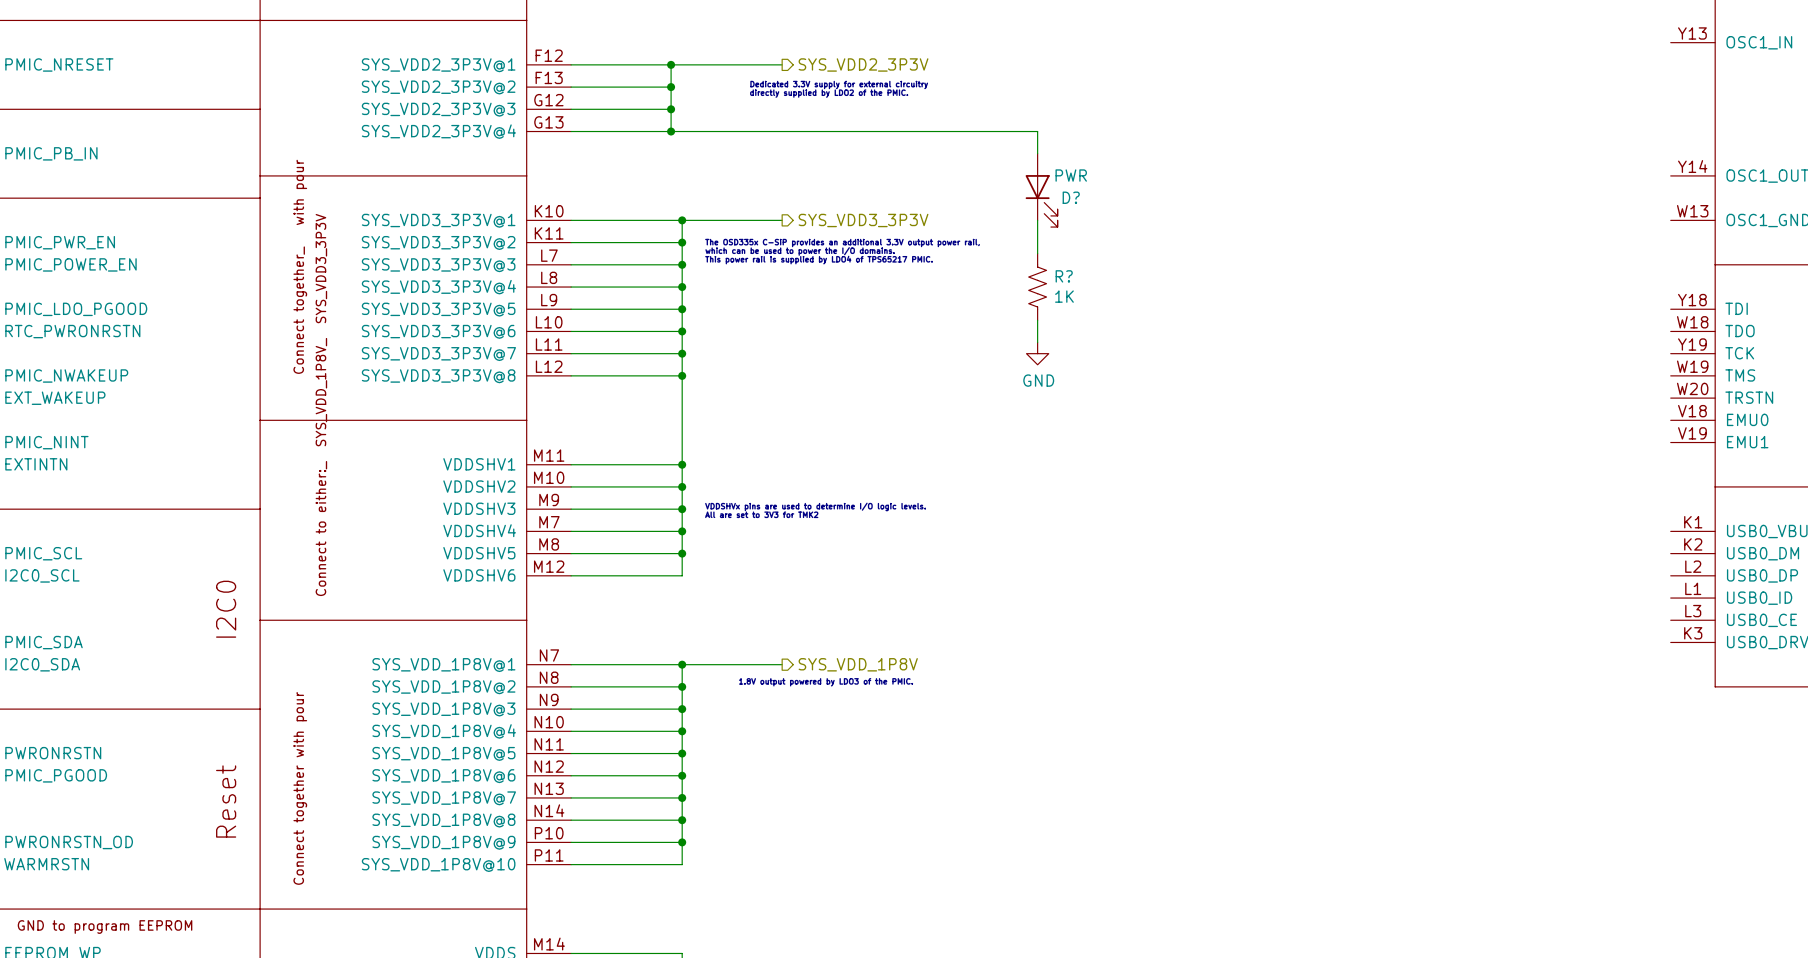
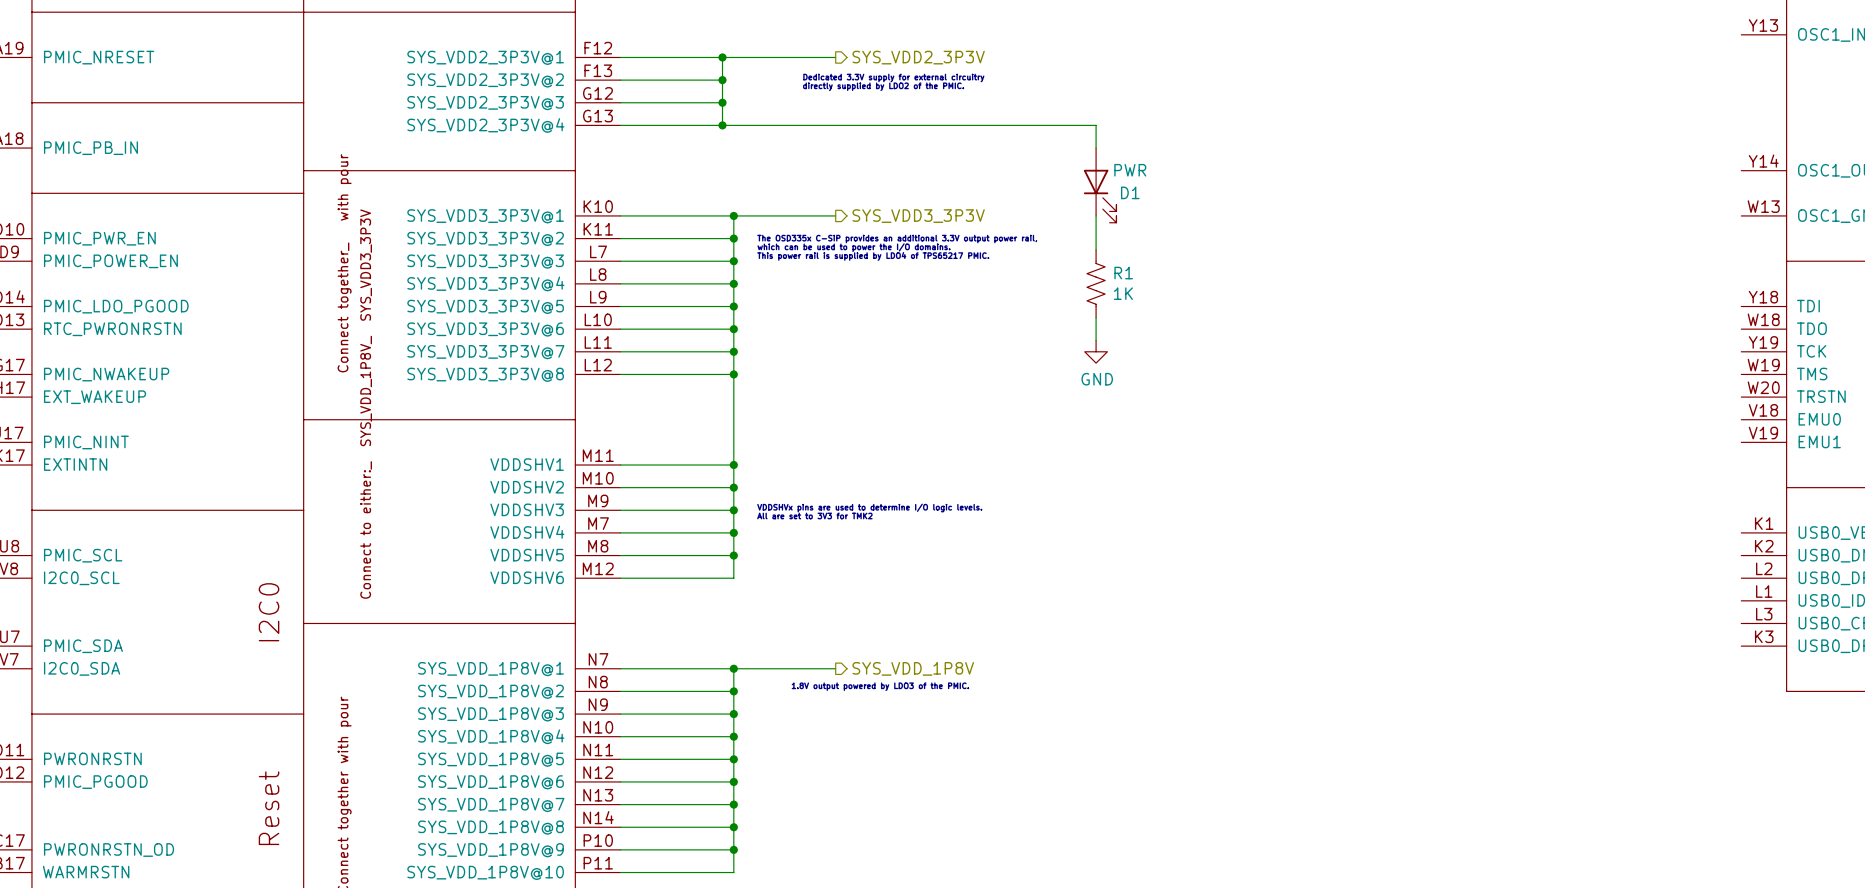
D? name: D? (1071, 197) -> D1 (1130, 192)
R? name: R? (1064, 276) -> R1 (1123, 273)

